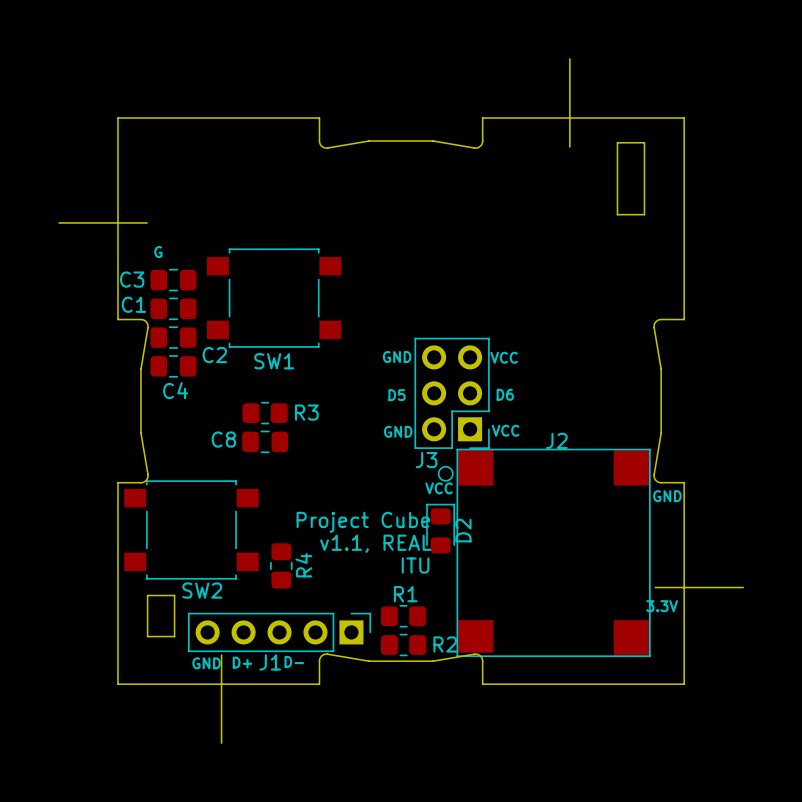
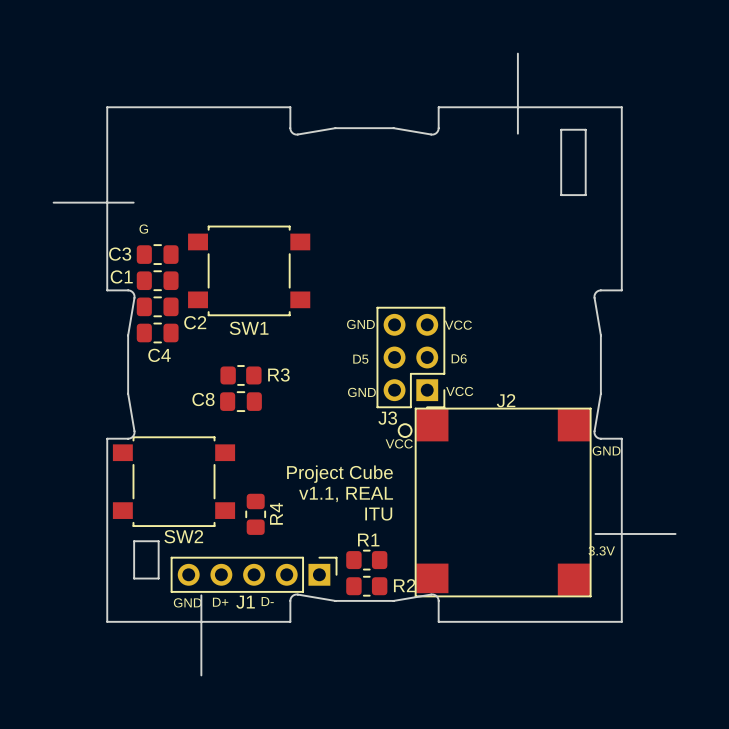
D2: (440, 528) -> none

